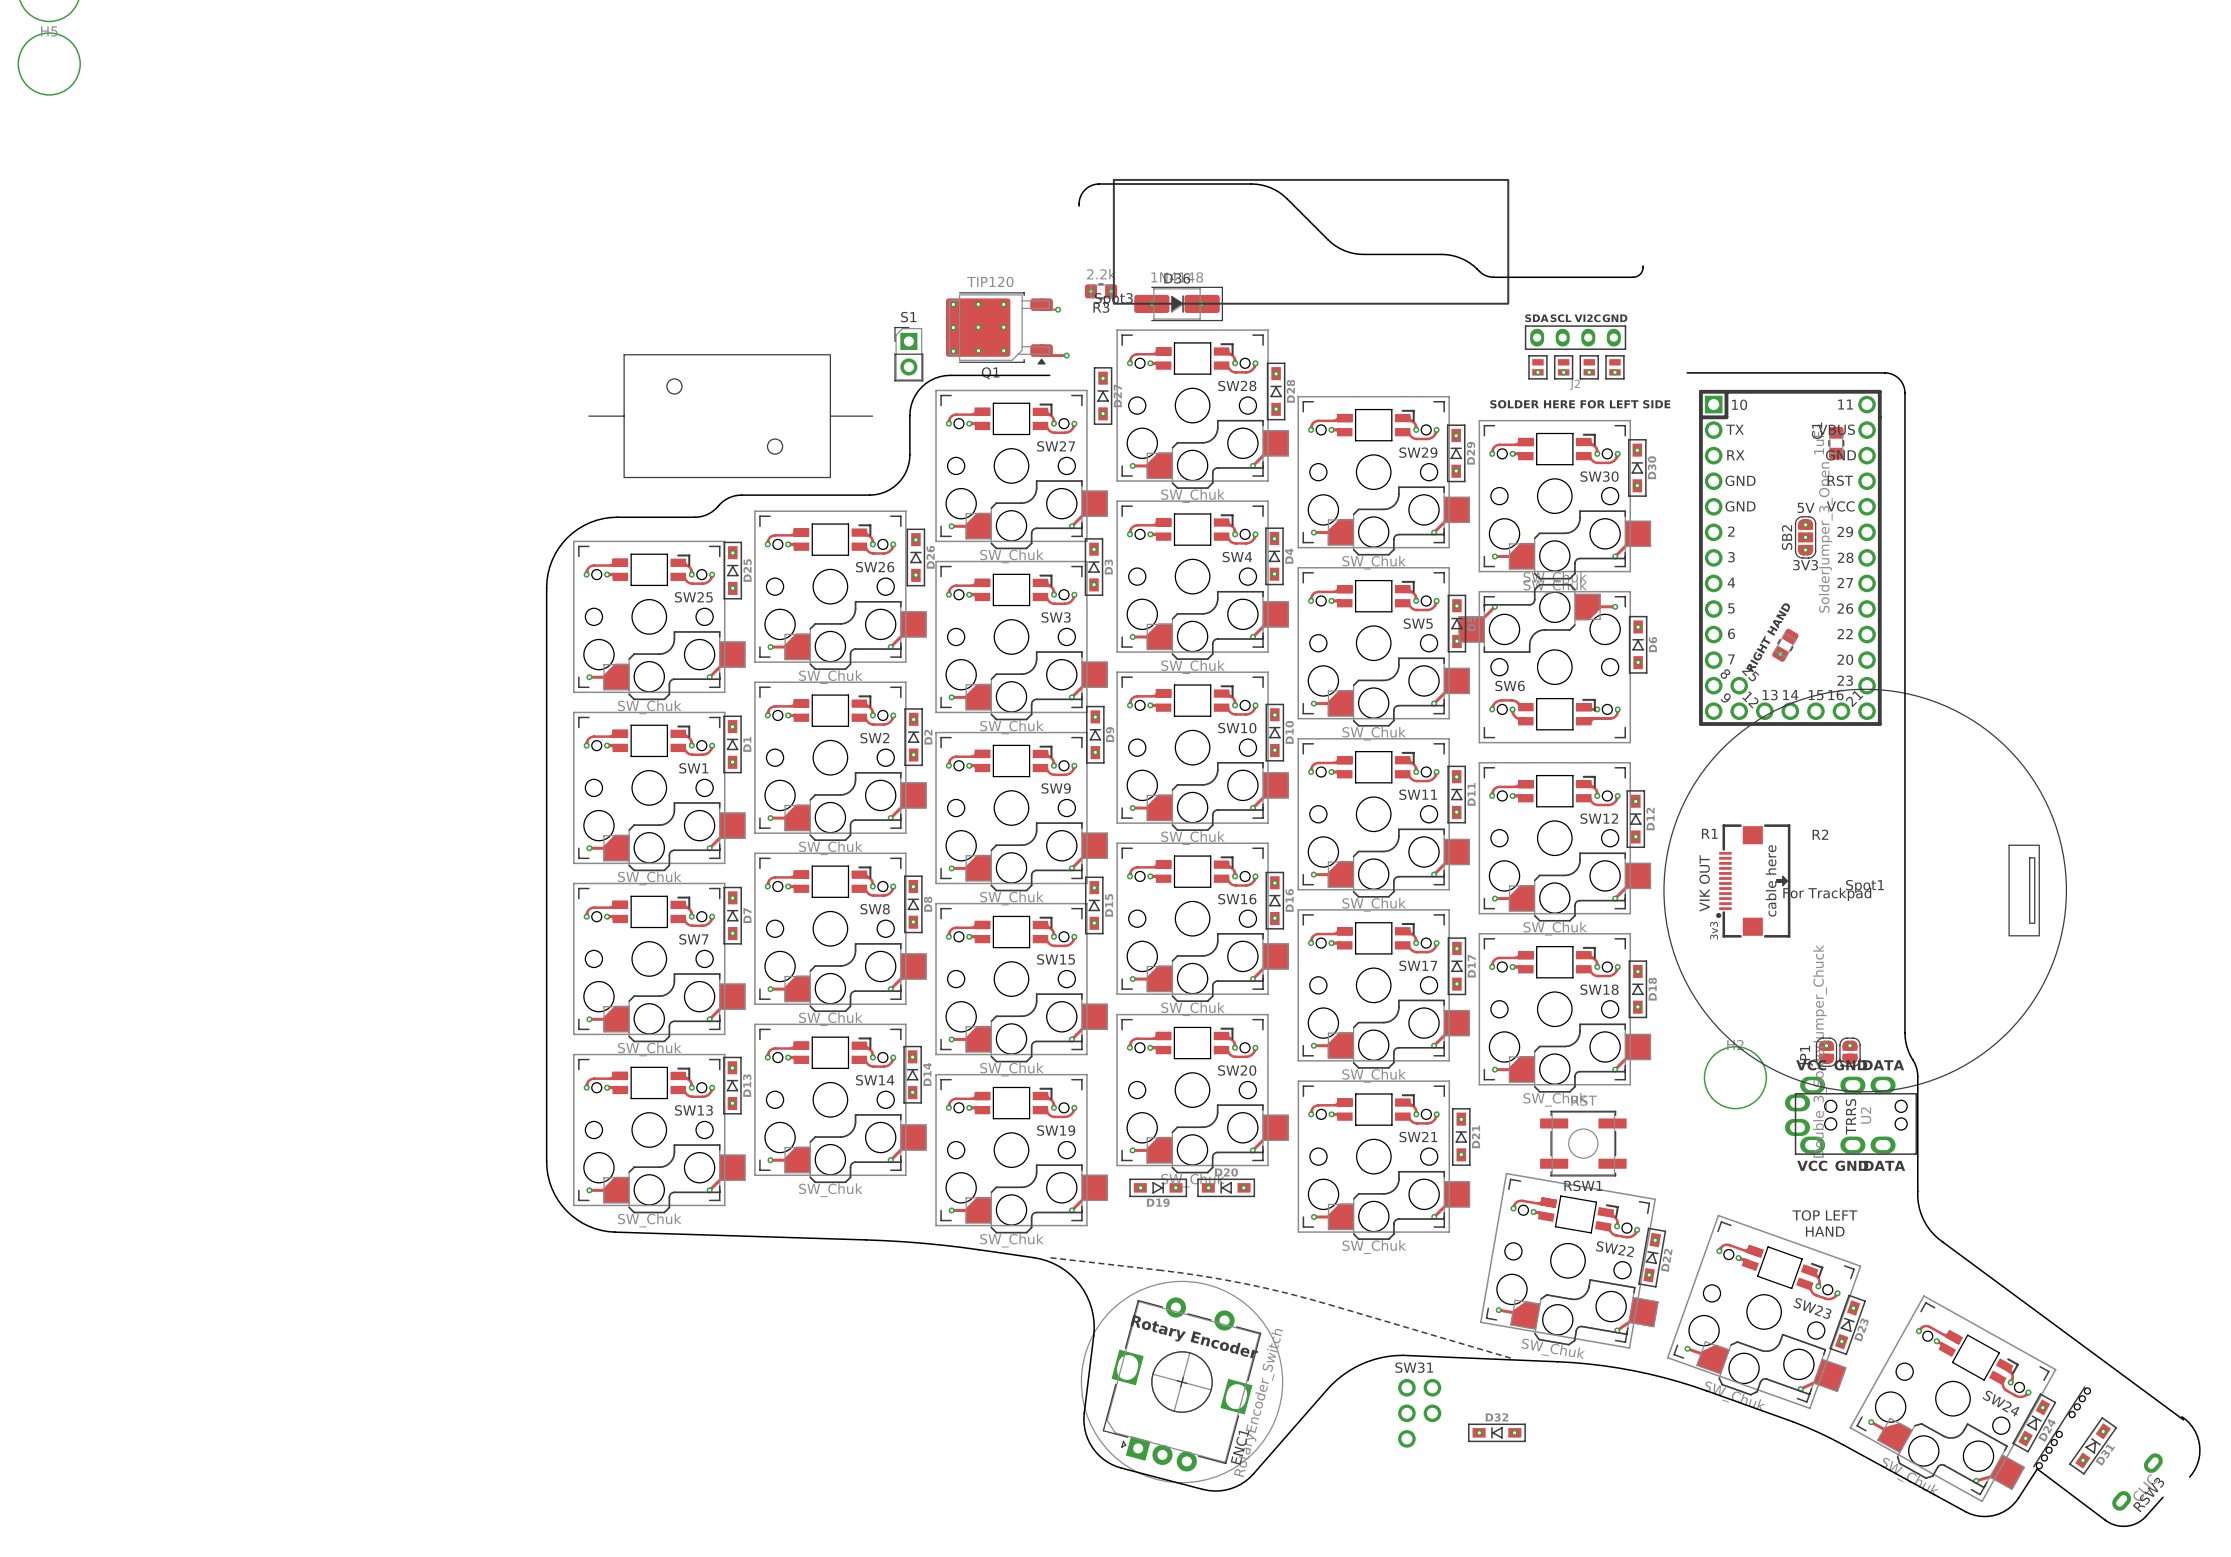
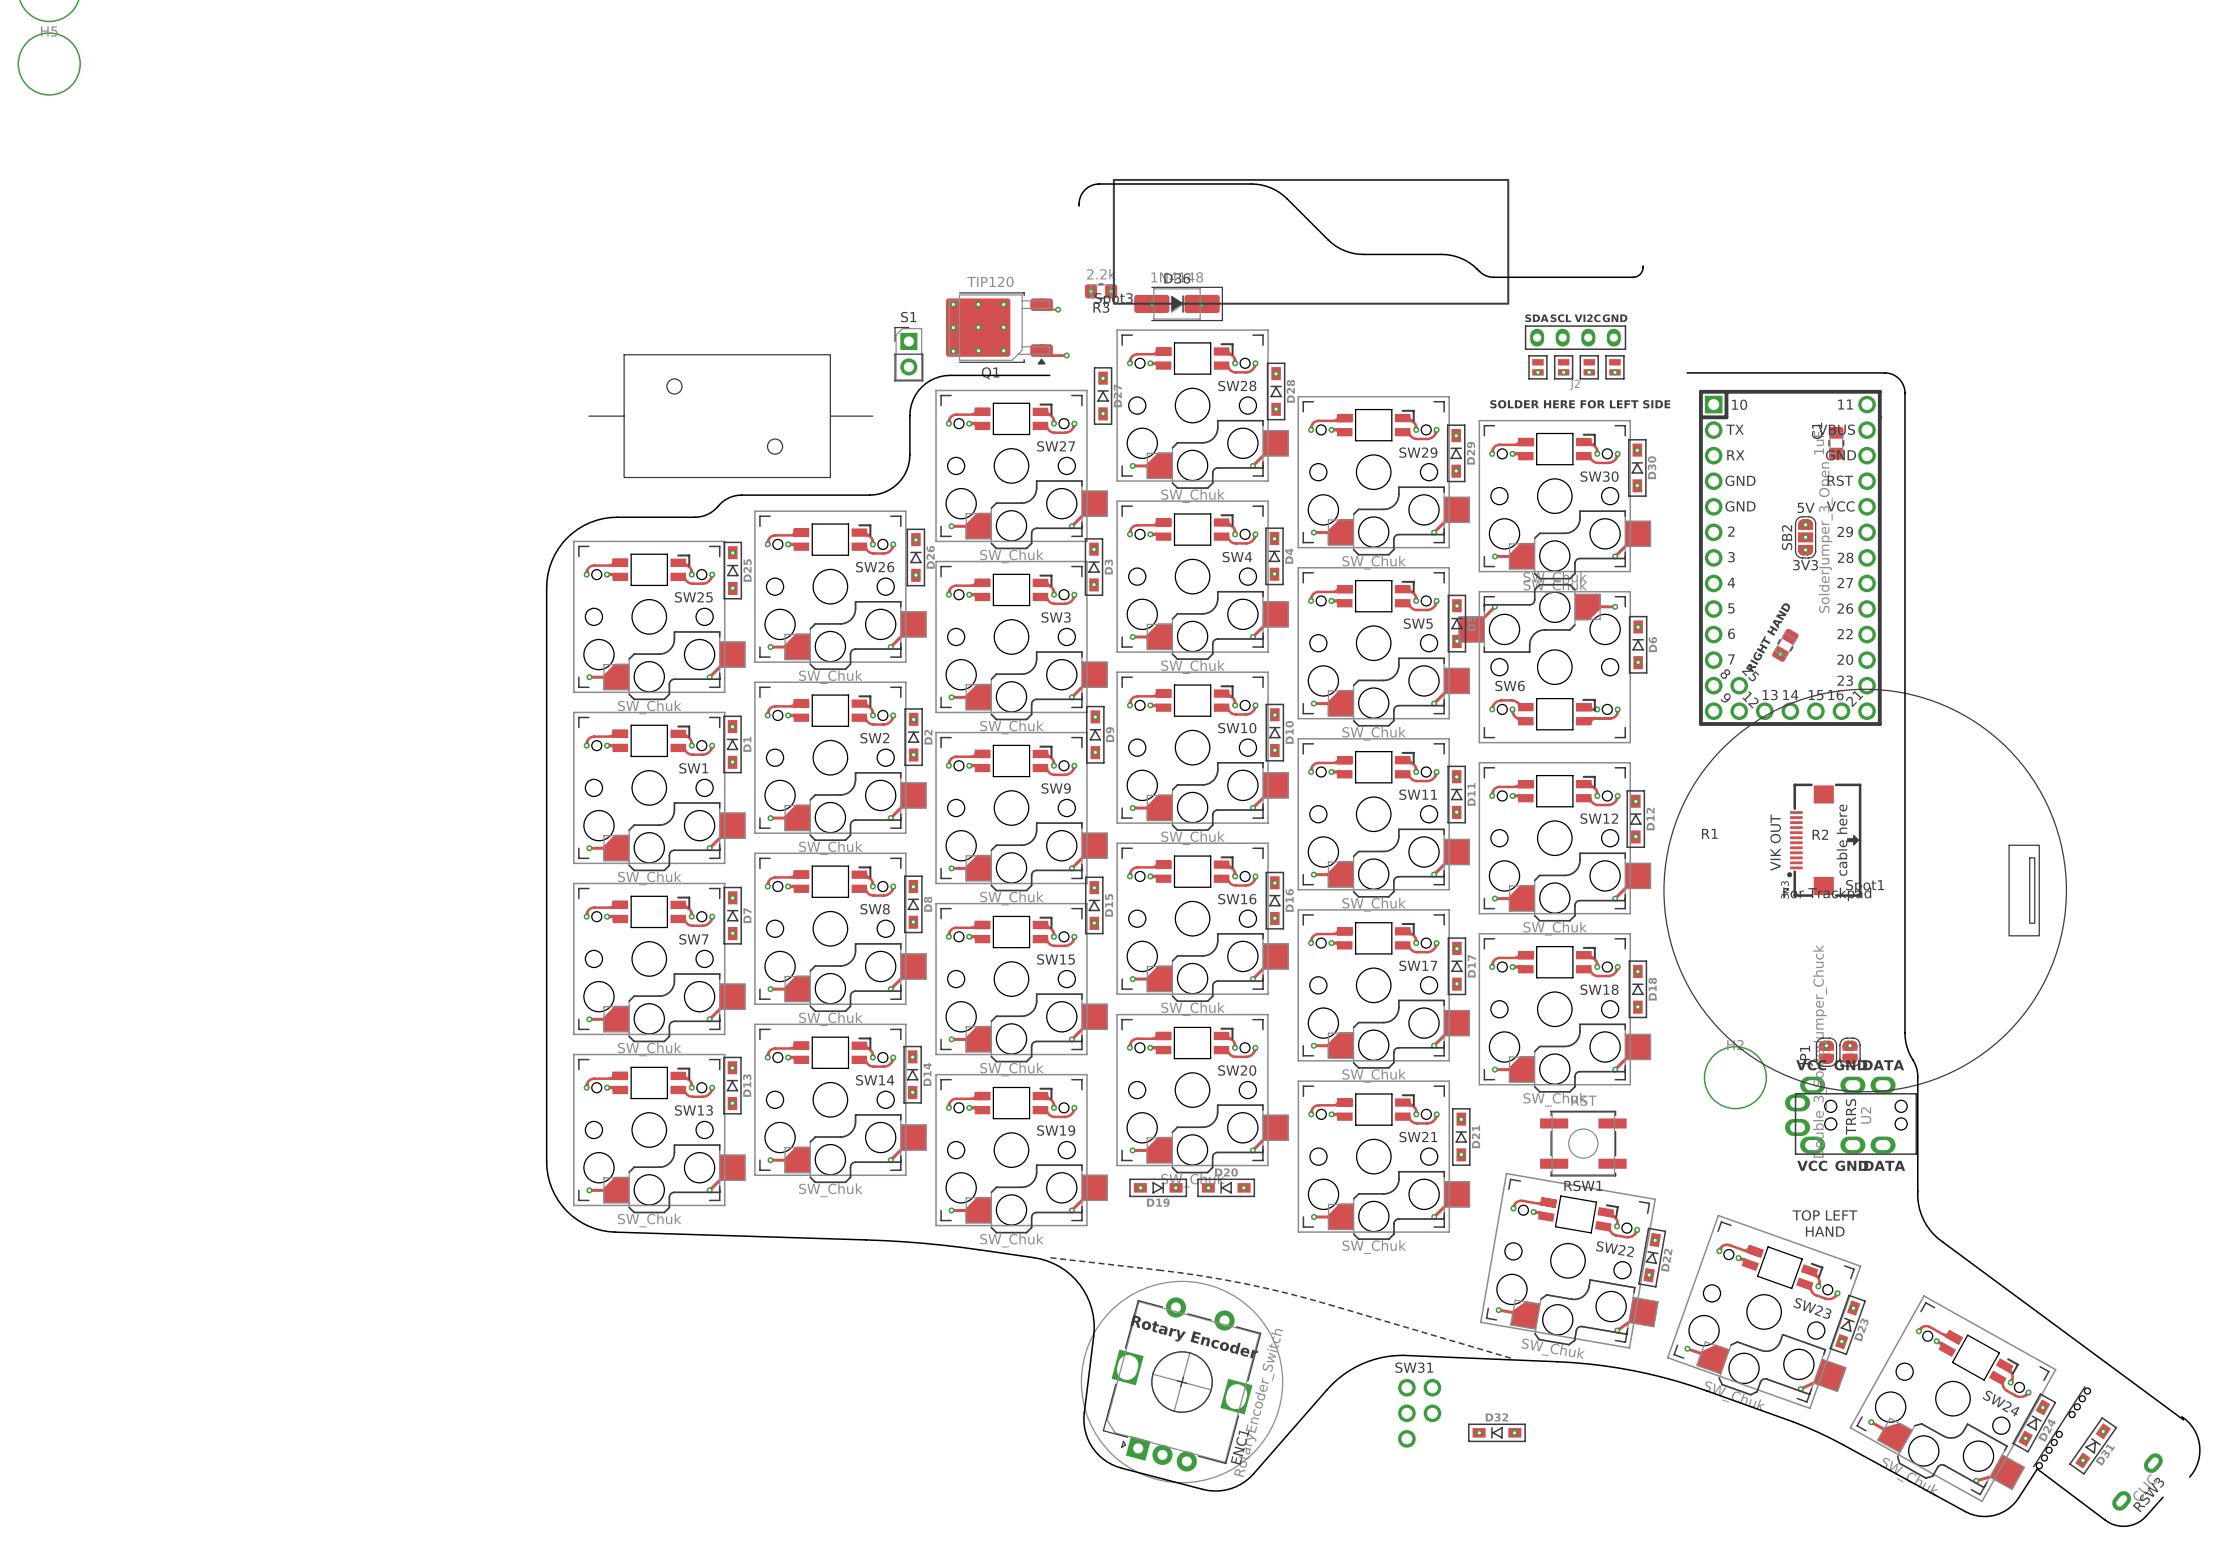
part position: (1753, 880) -> (1824, 840)

